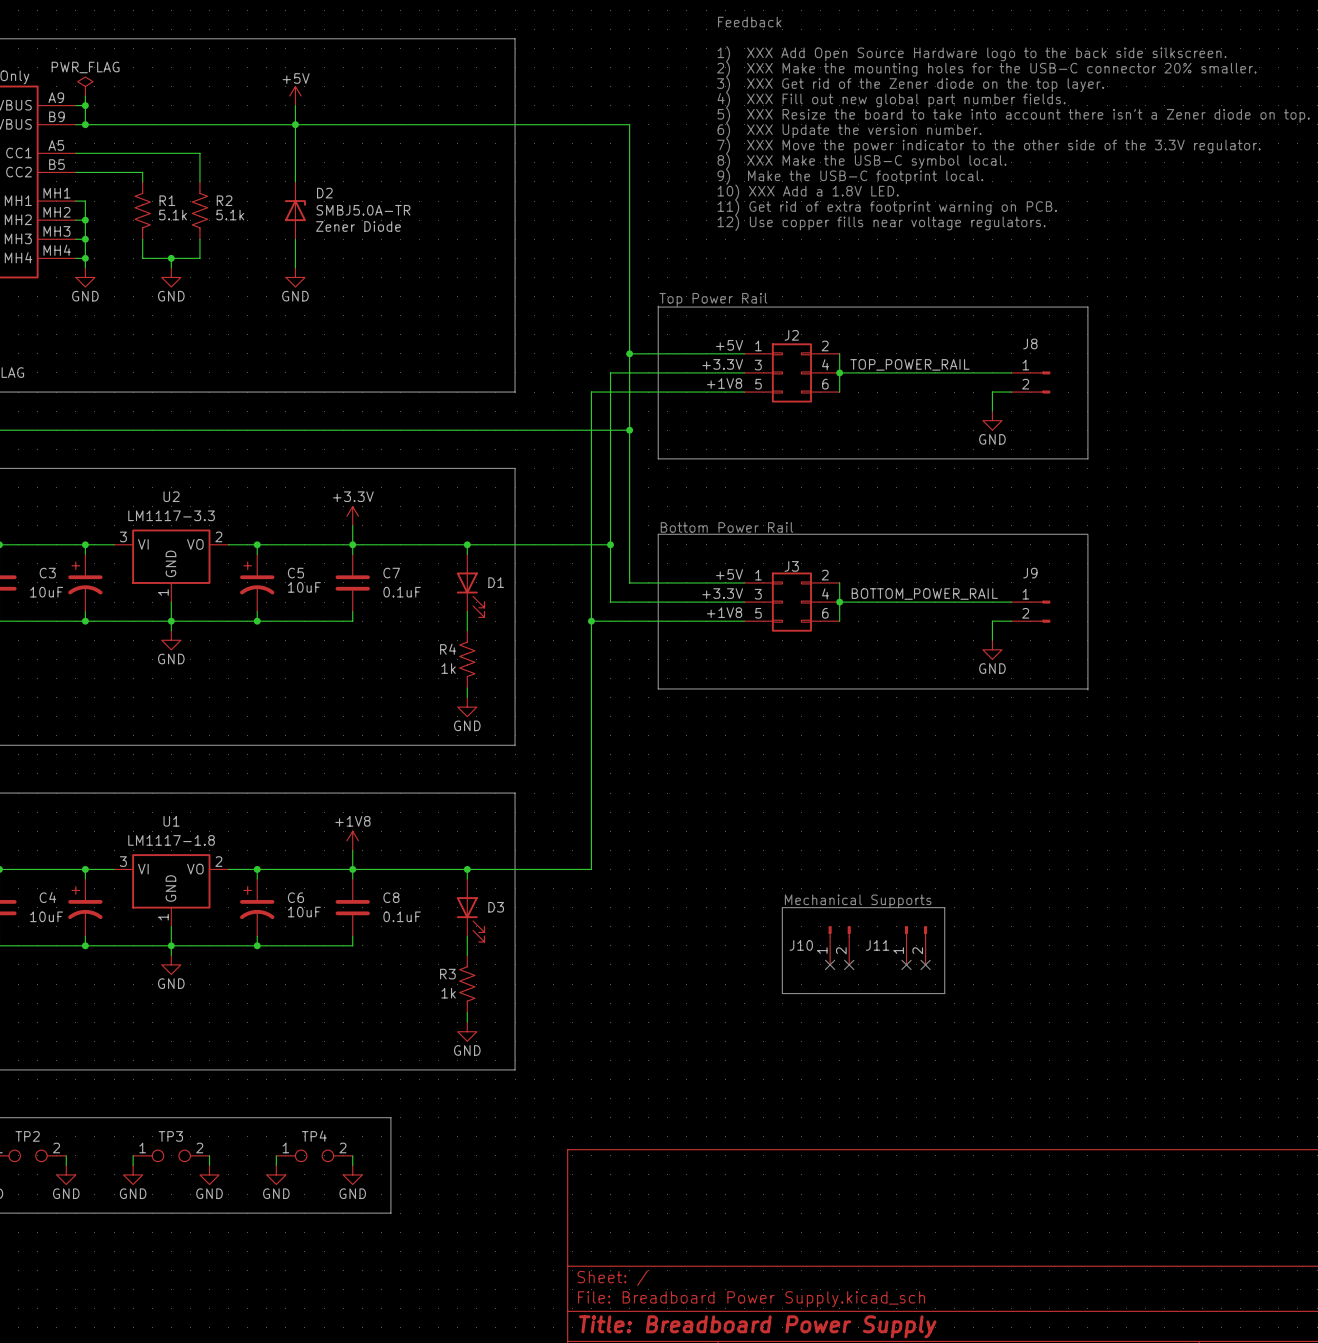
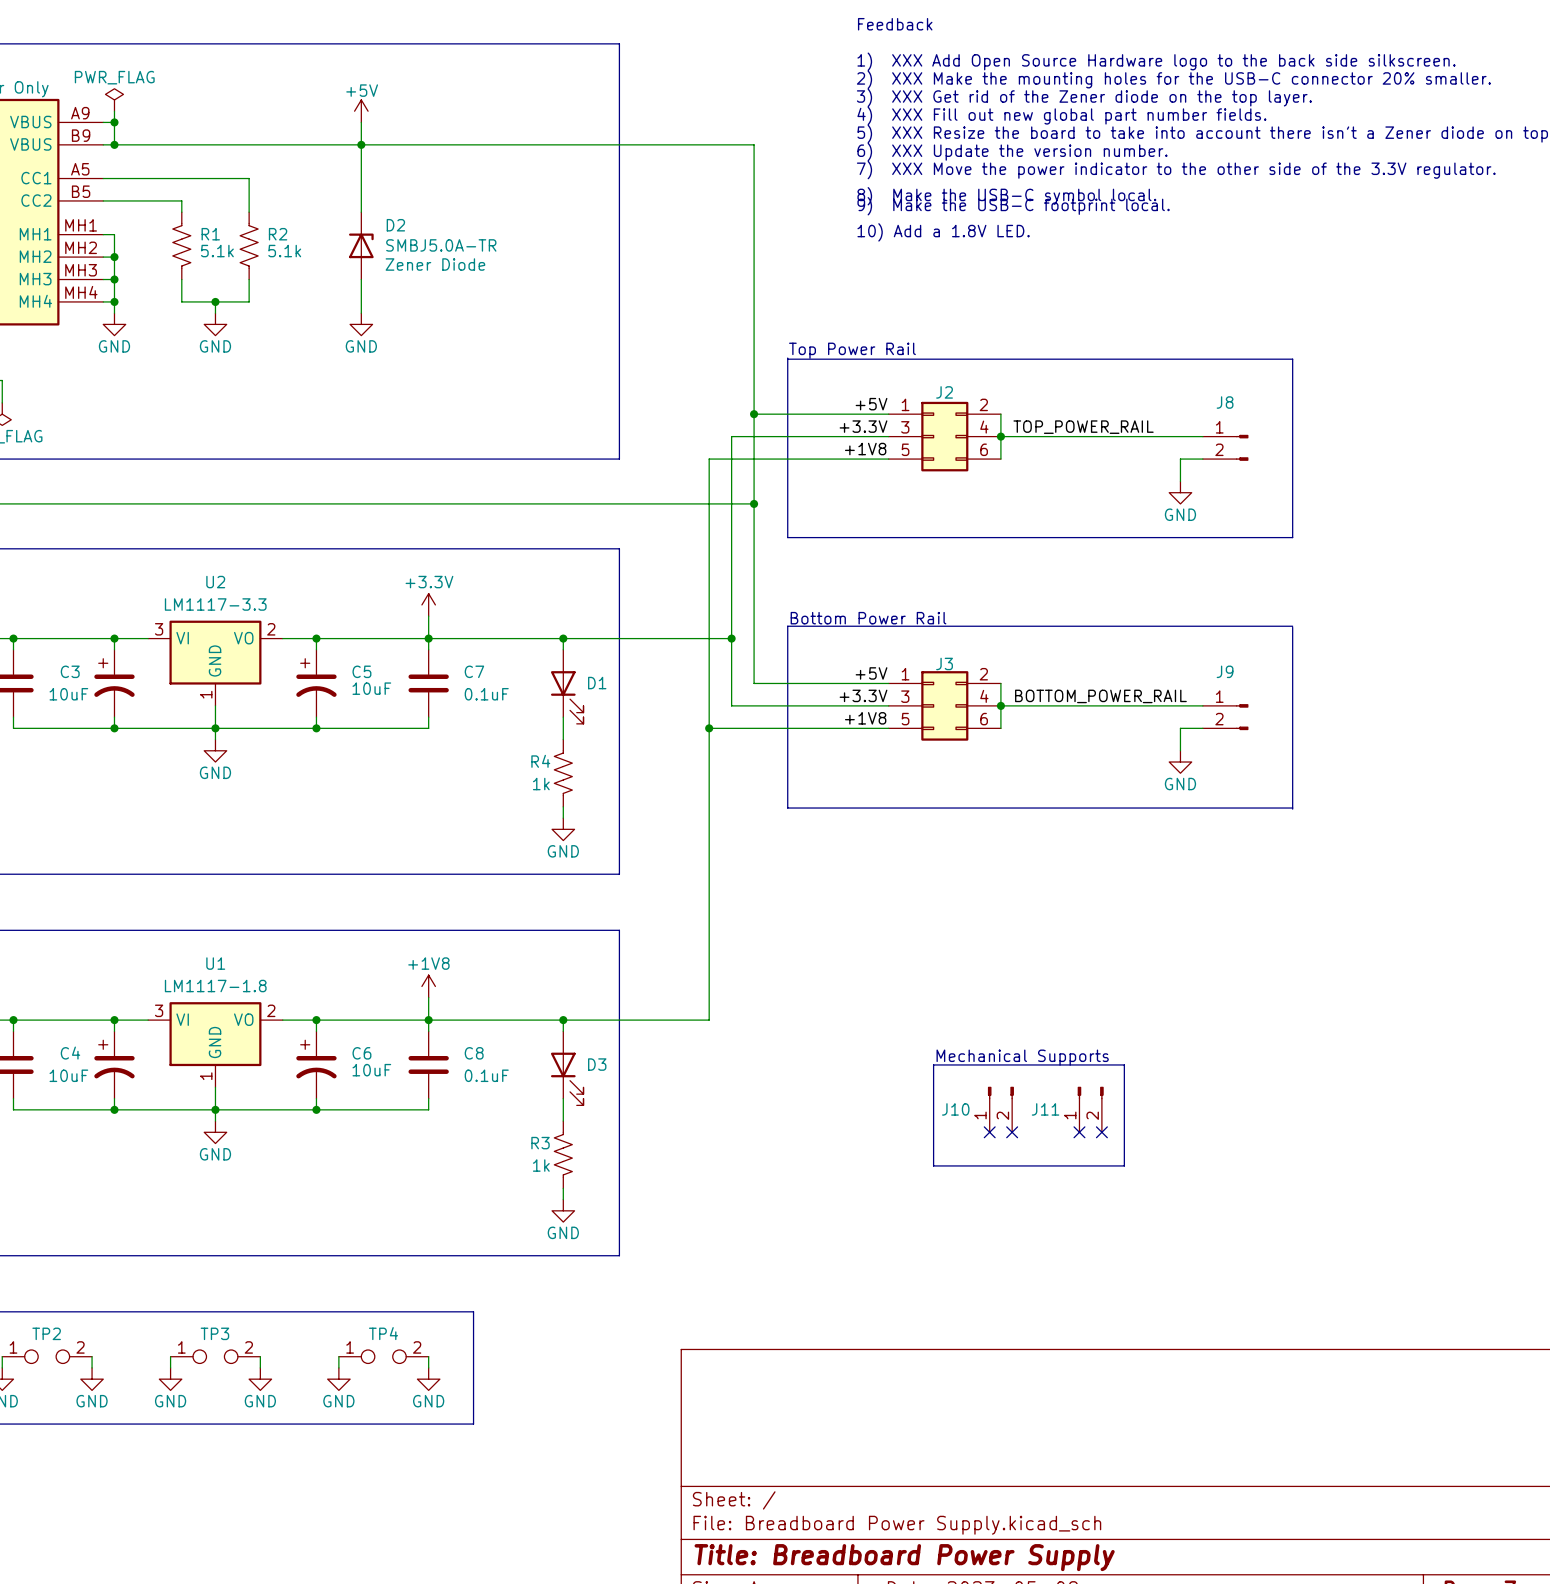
text: 8) XXX Make the USB-C symbol local. (862, 161) -> 8) Make the USB-C symbol local. (1006, 196)
text: 10) XXX Add a 1.8V LED. (808, 192) -> 10) Add a 1.8V LED. (943, 232)
text: 11) Get rid of extra footprint warning on PCB. (887, 207) -> none
text: 12) Use copper fills near voltage regulators. (881, 223) -> none

